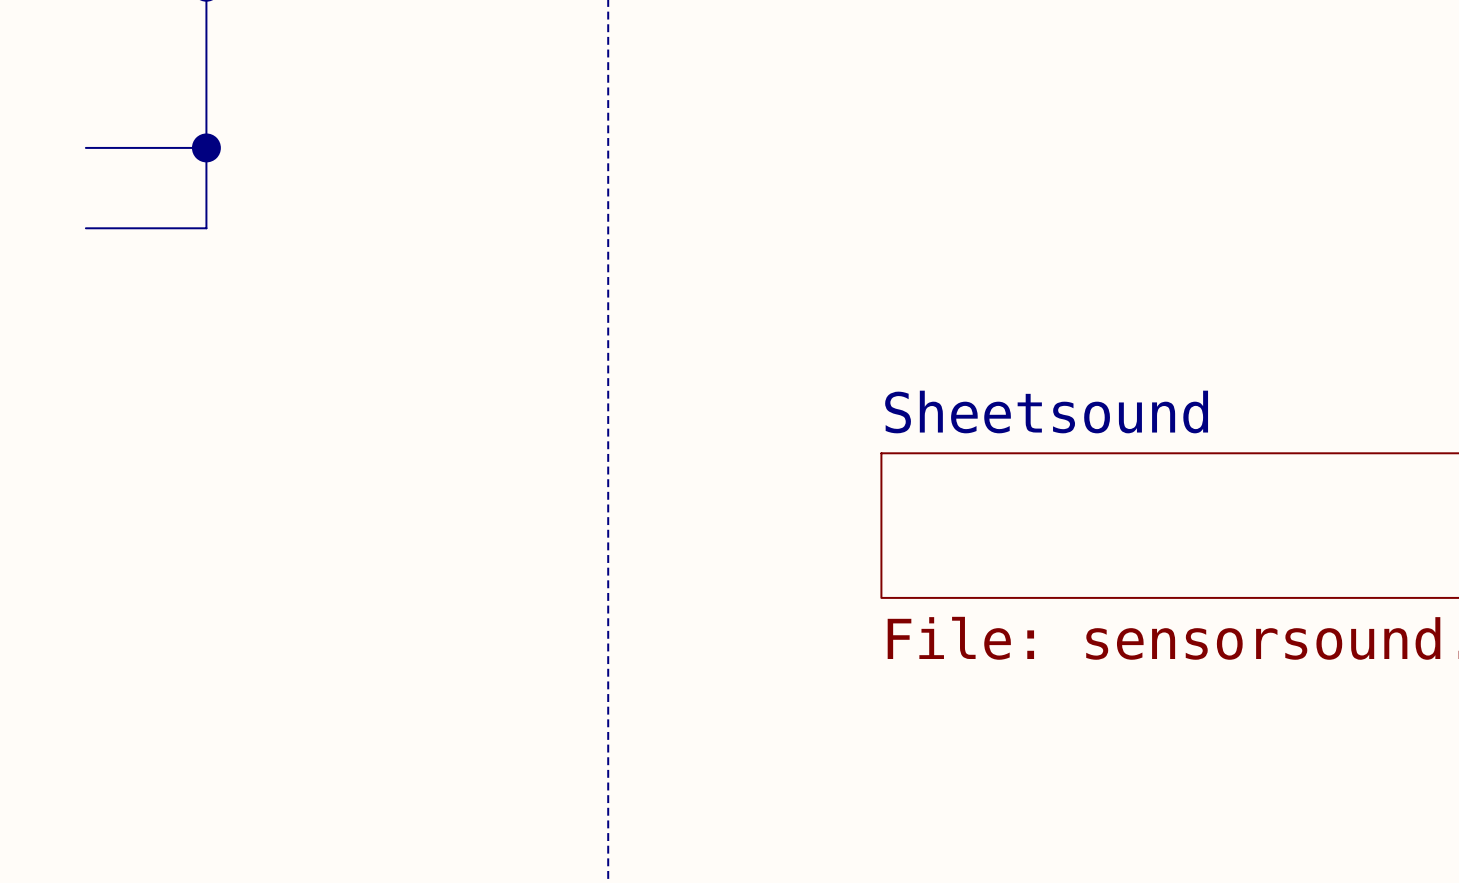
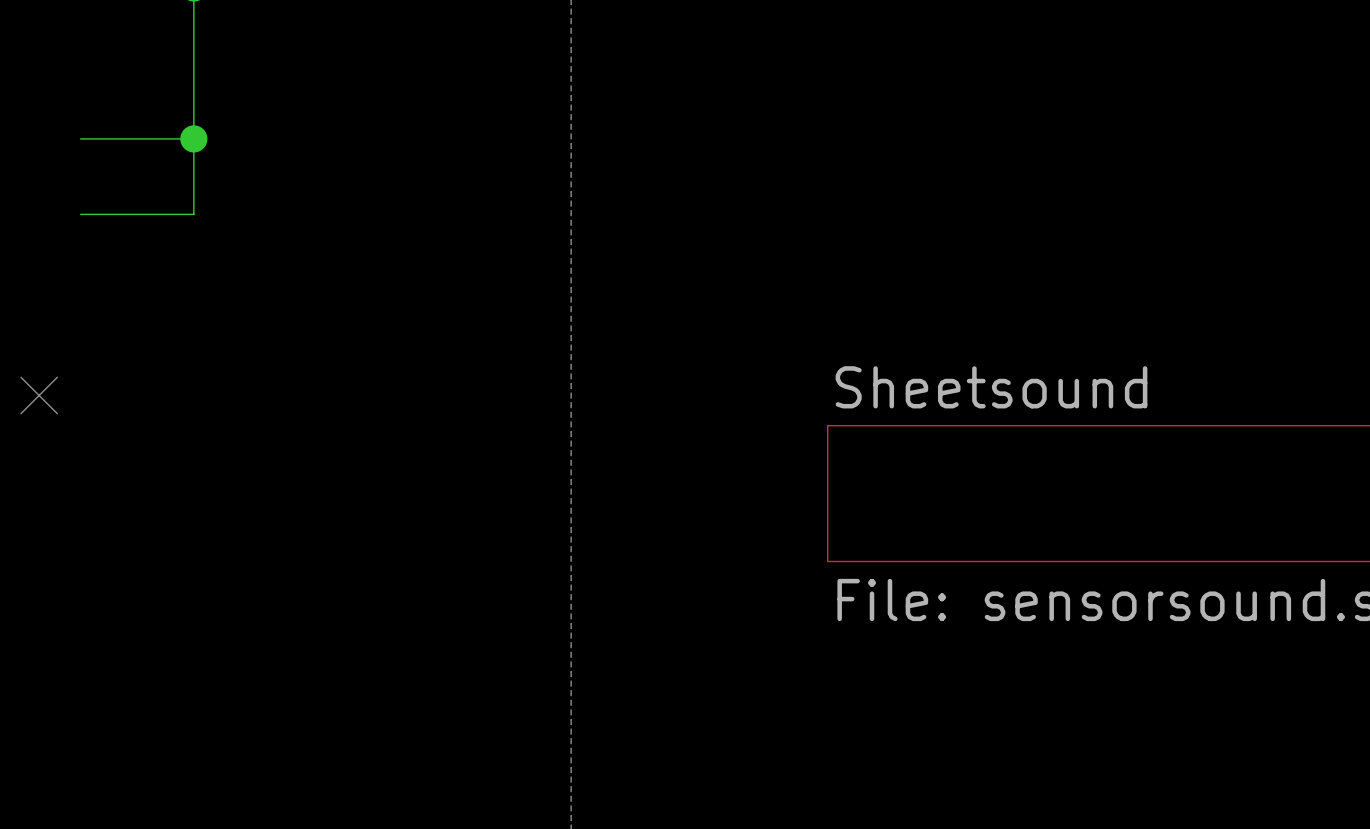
no-connect mark: none -> (39, 395)

